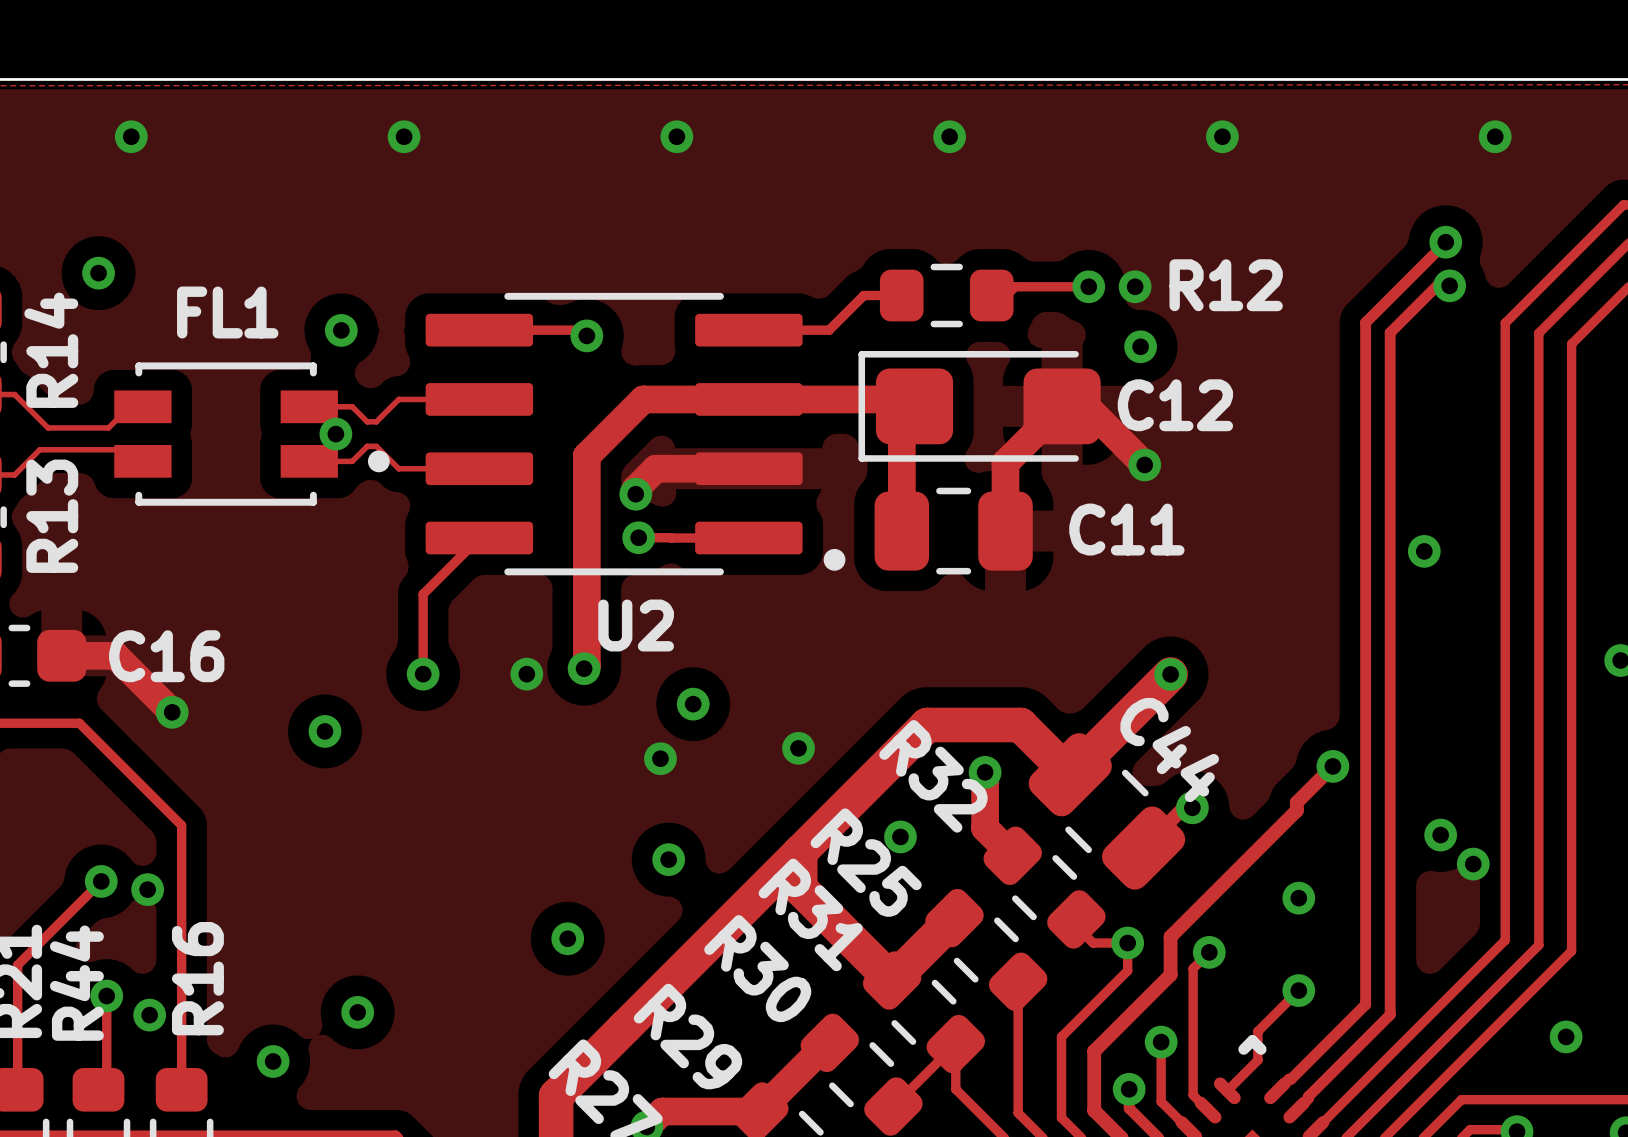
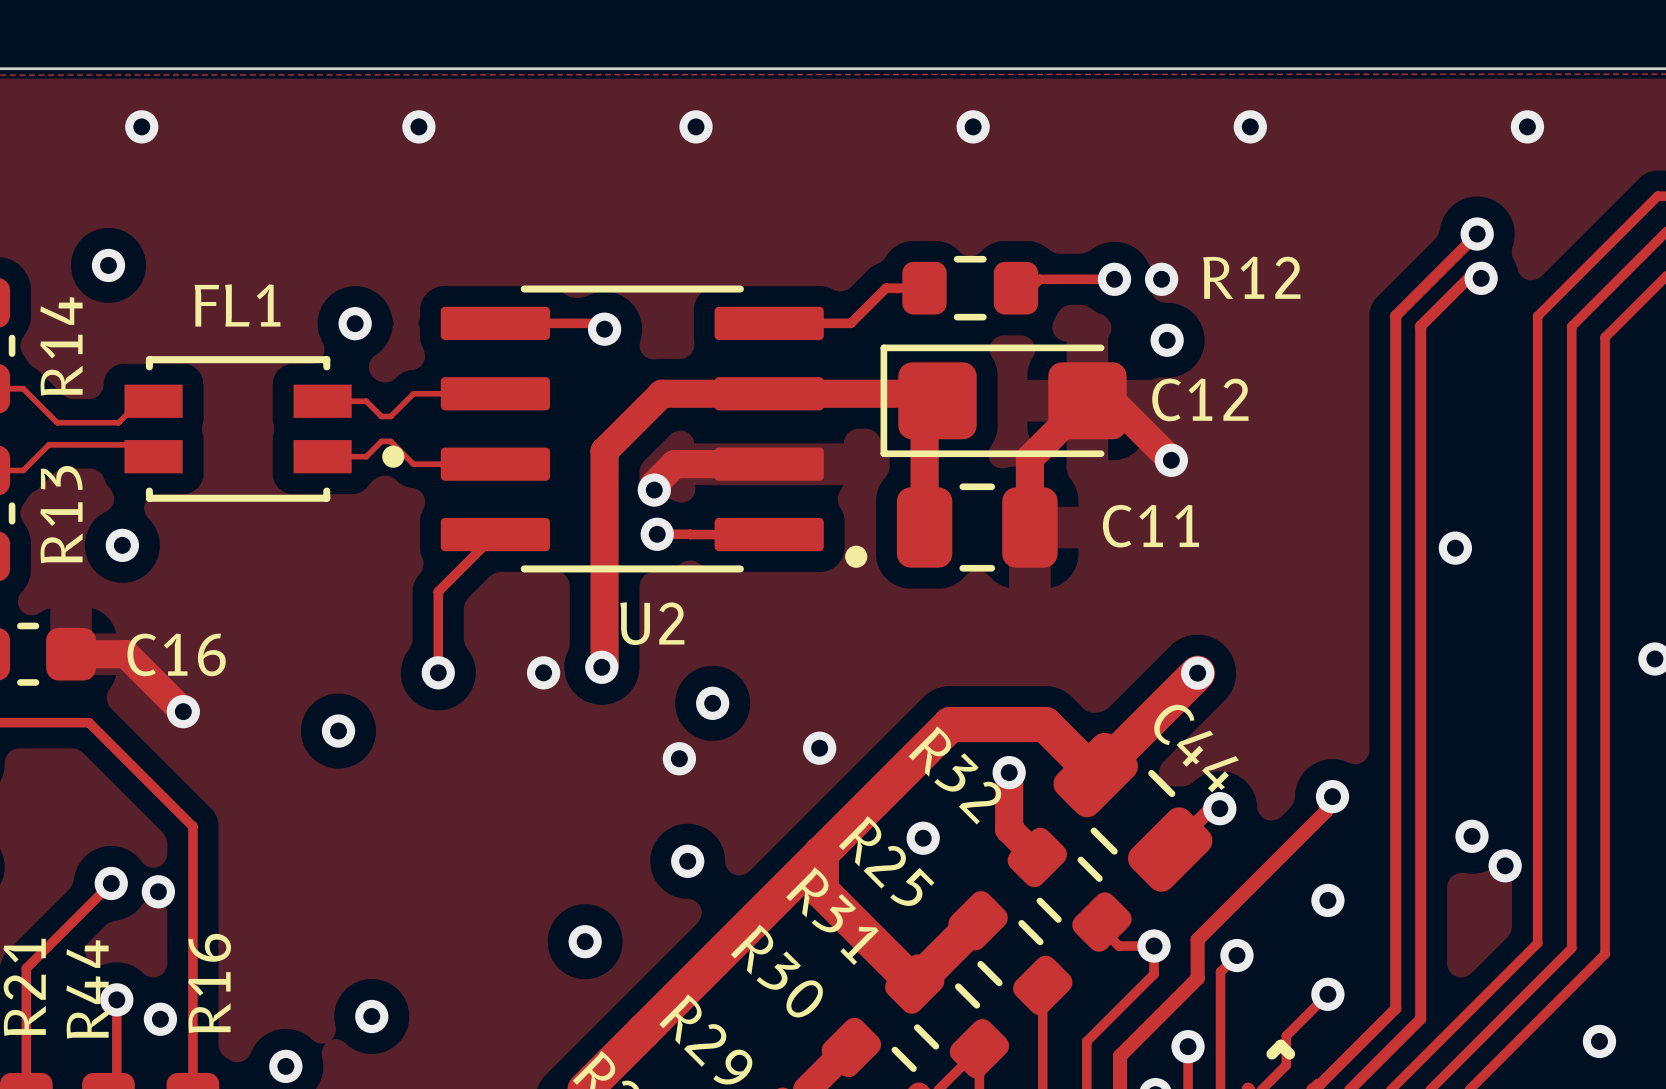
via position: (335, 434) -> (122, 545)
track: (1332, 766) (1303, 795) -> none
via position: (1332, 766) -> (1332, 796)

